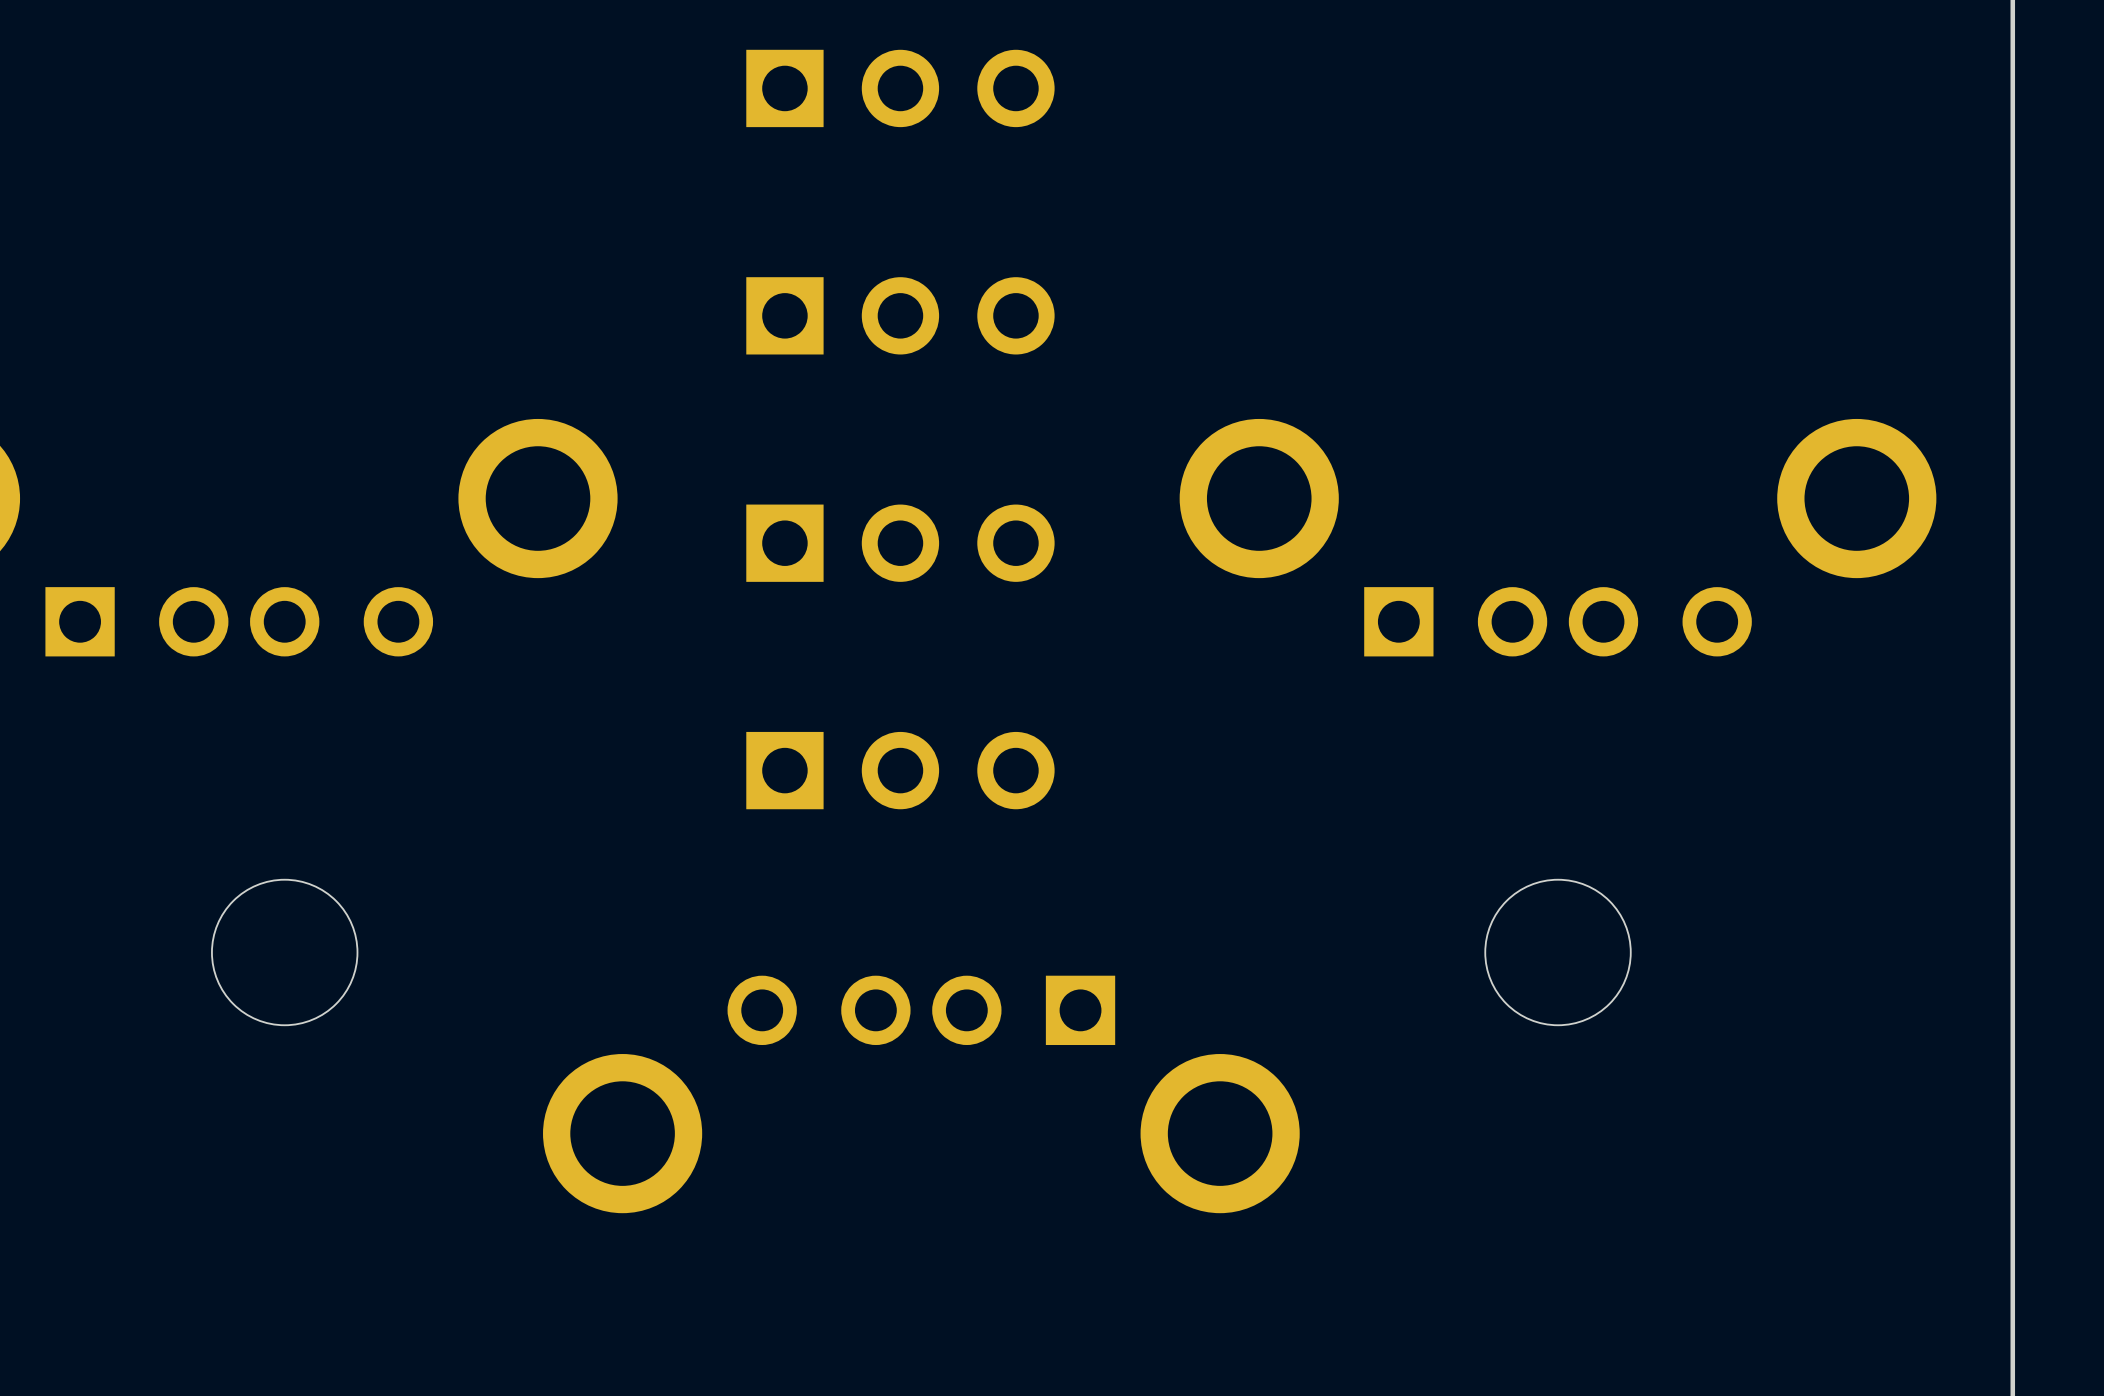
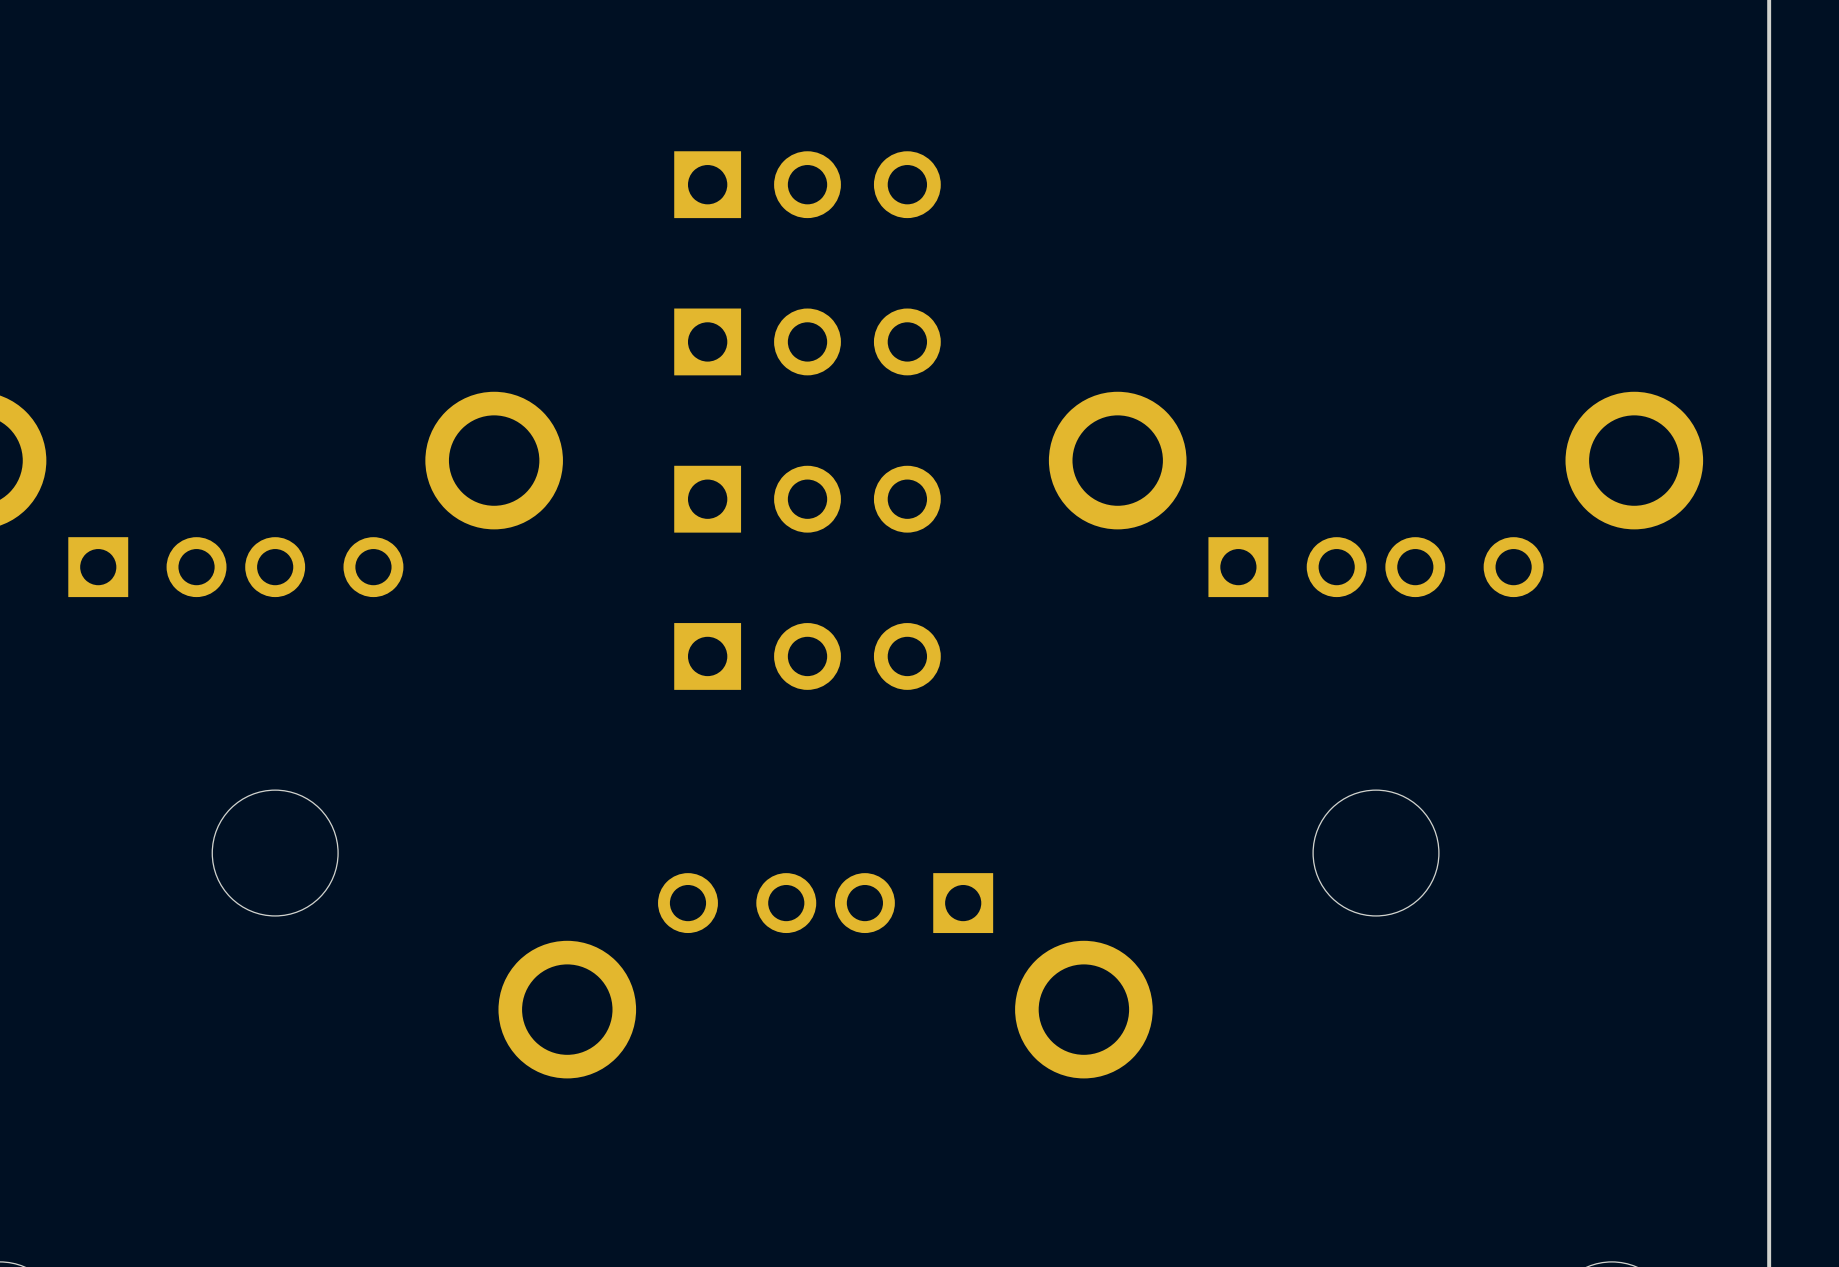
part position: (900, 88) -> (807, 184)
part position: (900, 315) -> (807, 341)
part position: (900, 770) -> (807, 656)

